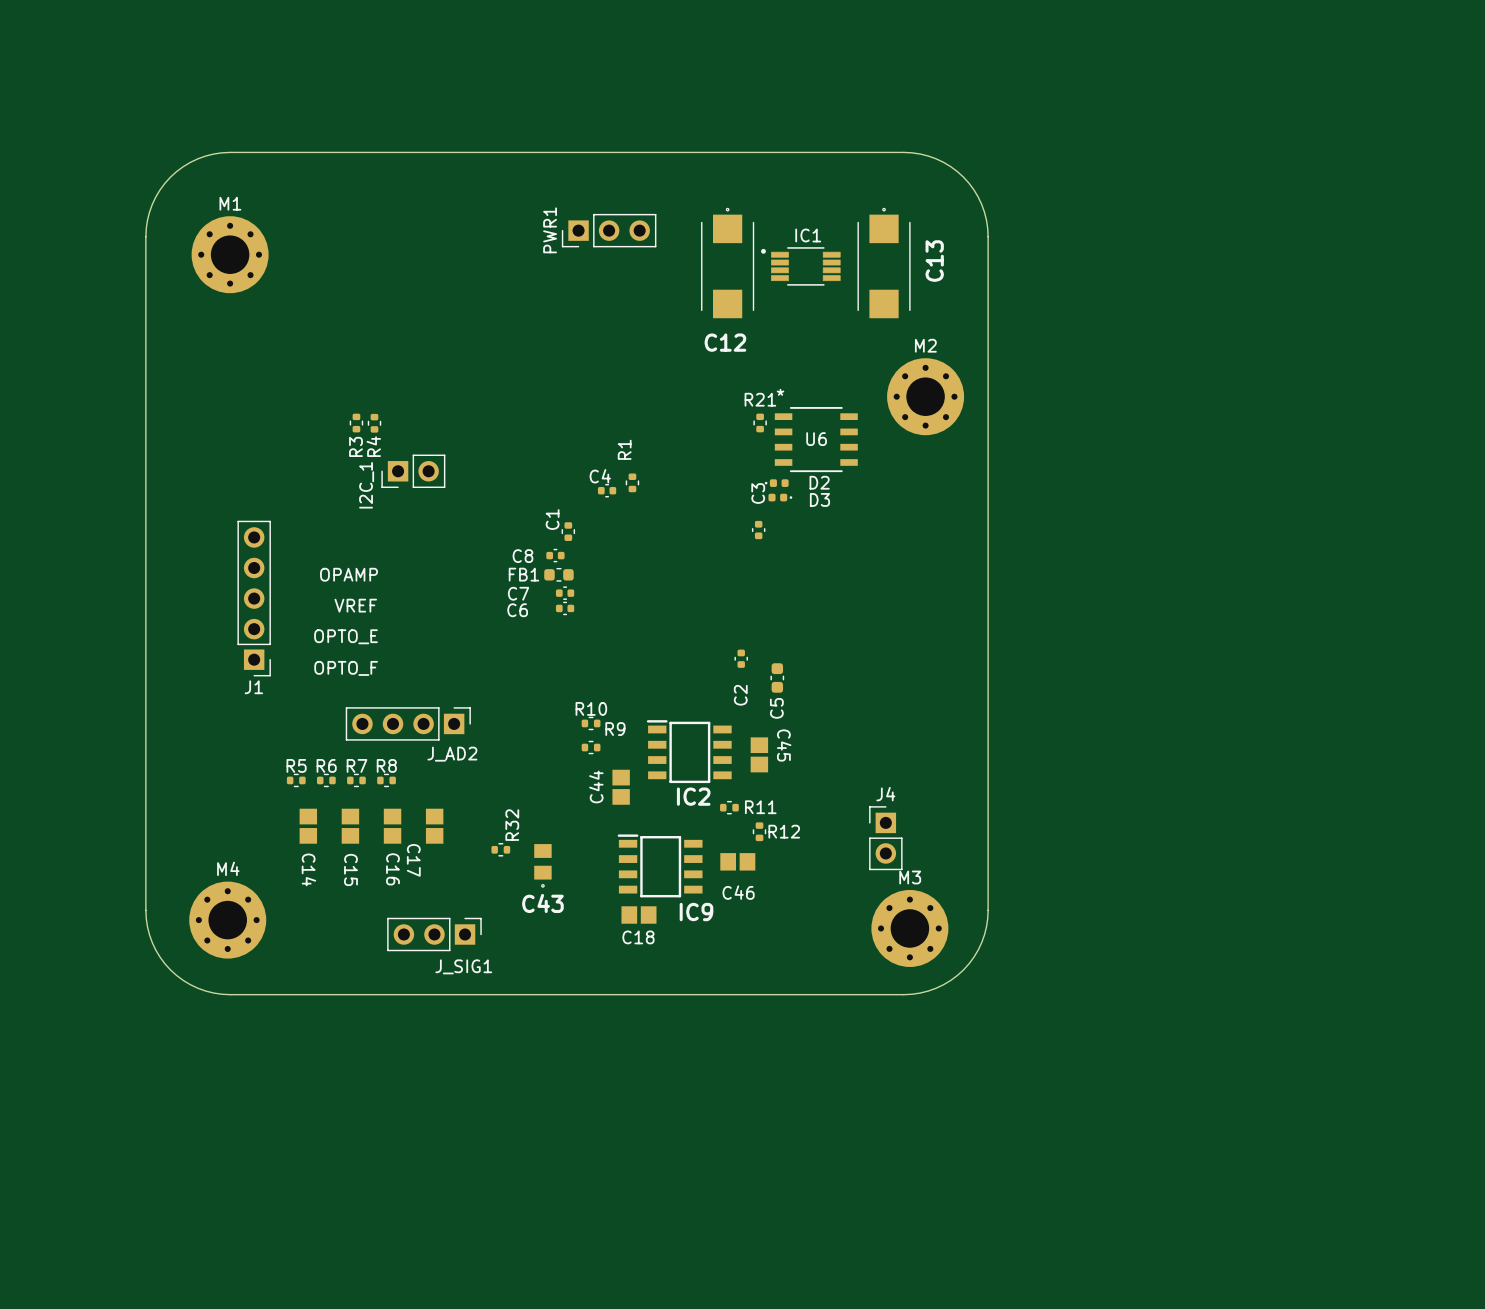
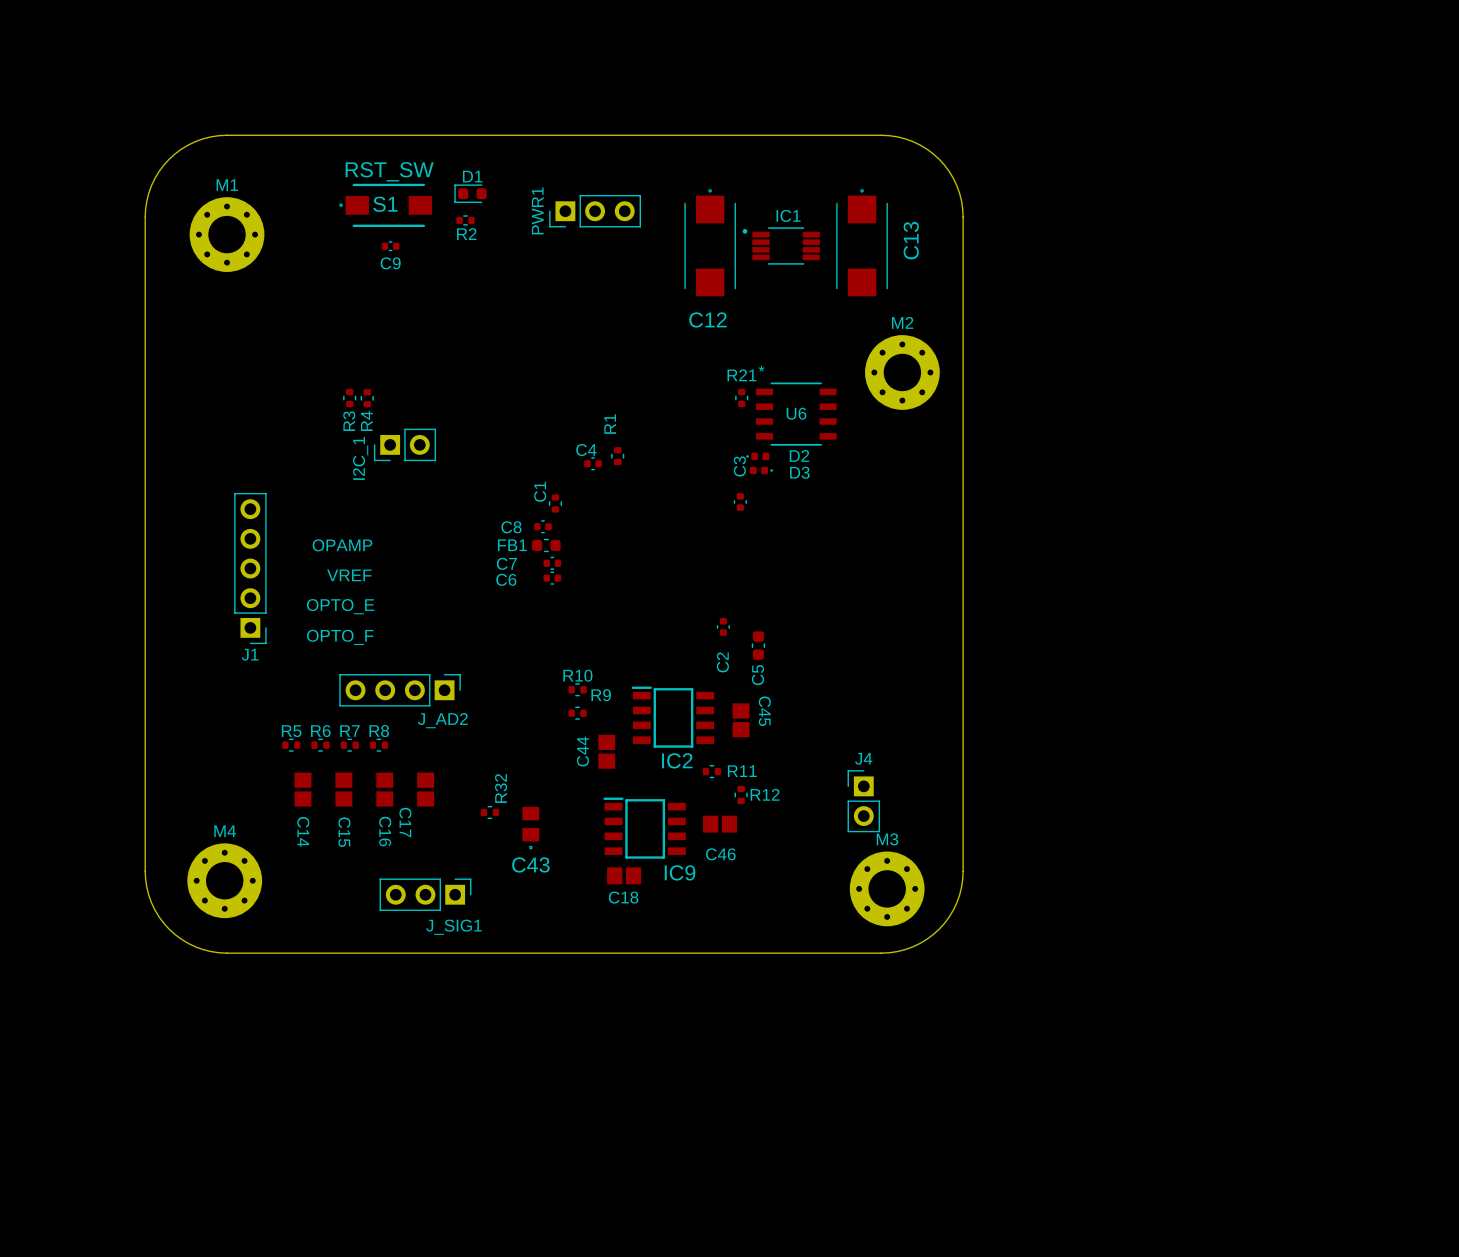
D1: none -> (470, 193)
S1: none -> RST_SW (385, 205)
R2: none -> (465, 220)
C9: none -> (390, 246)

